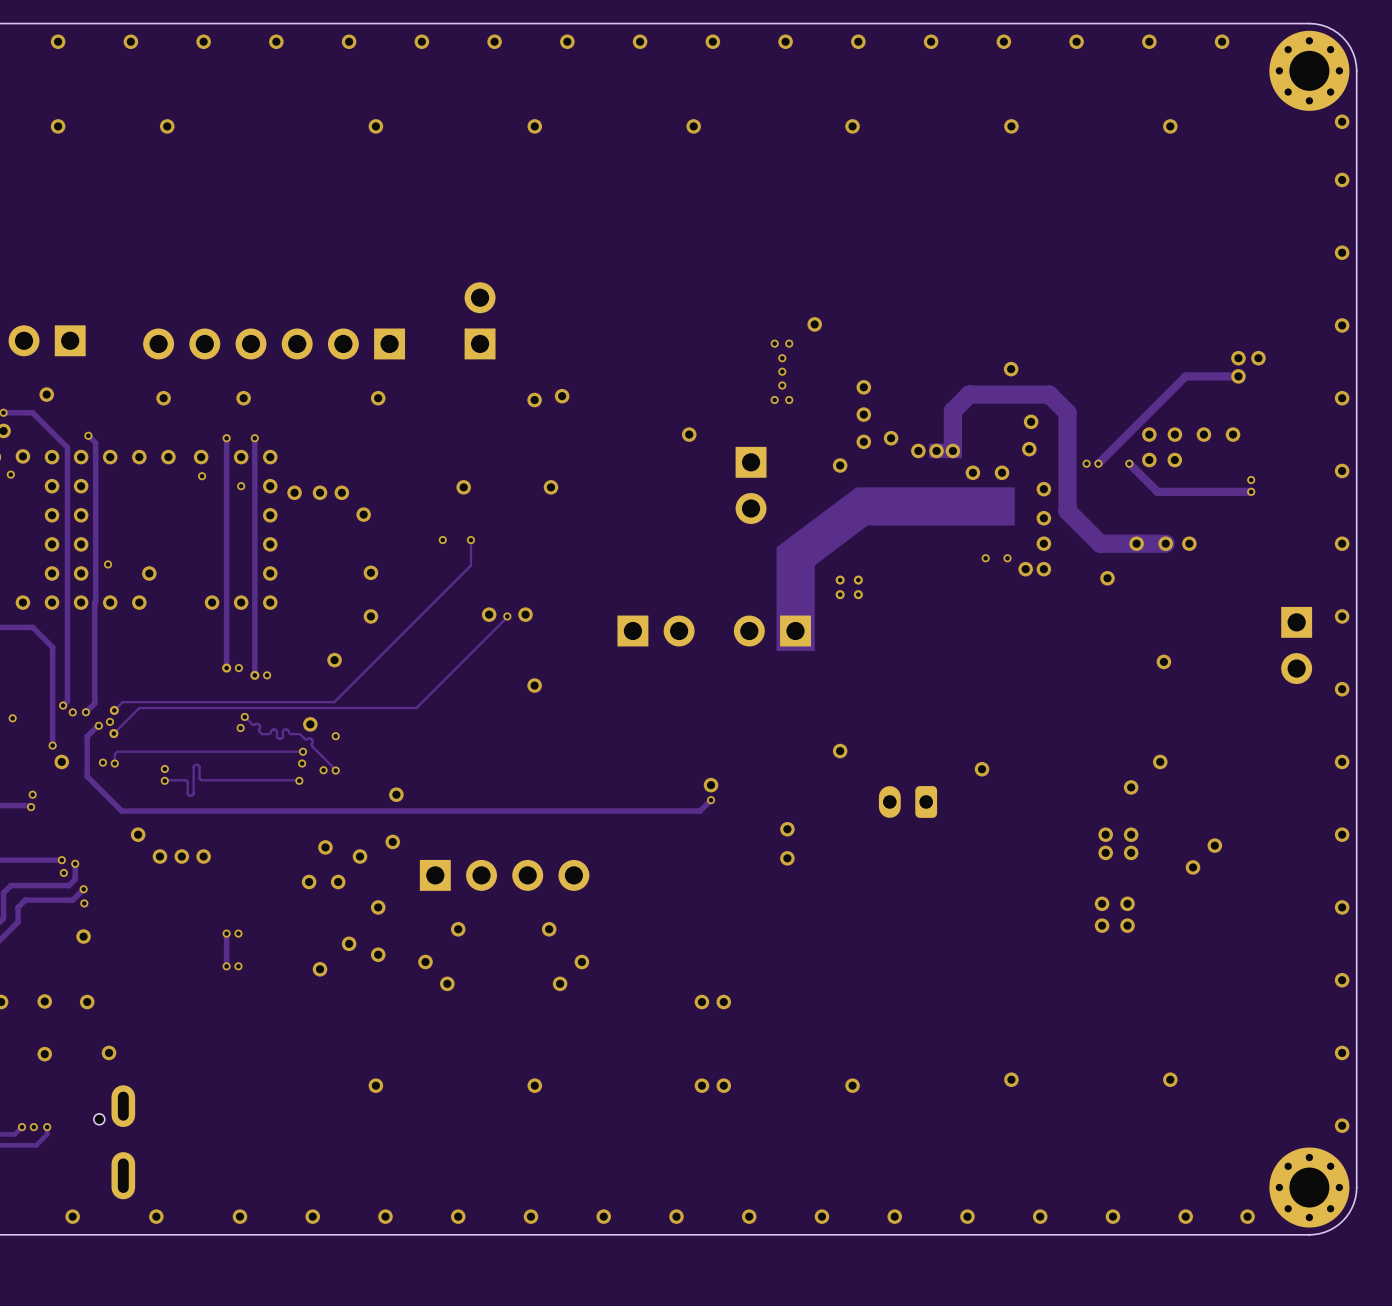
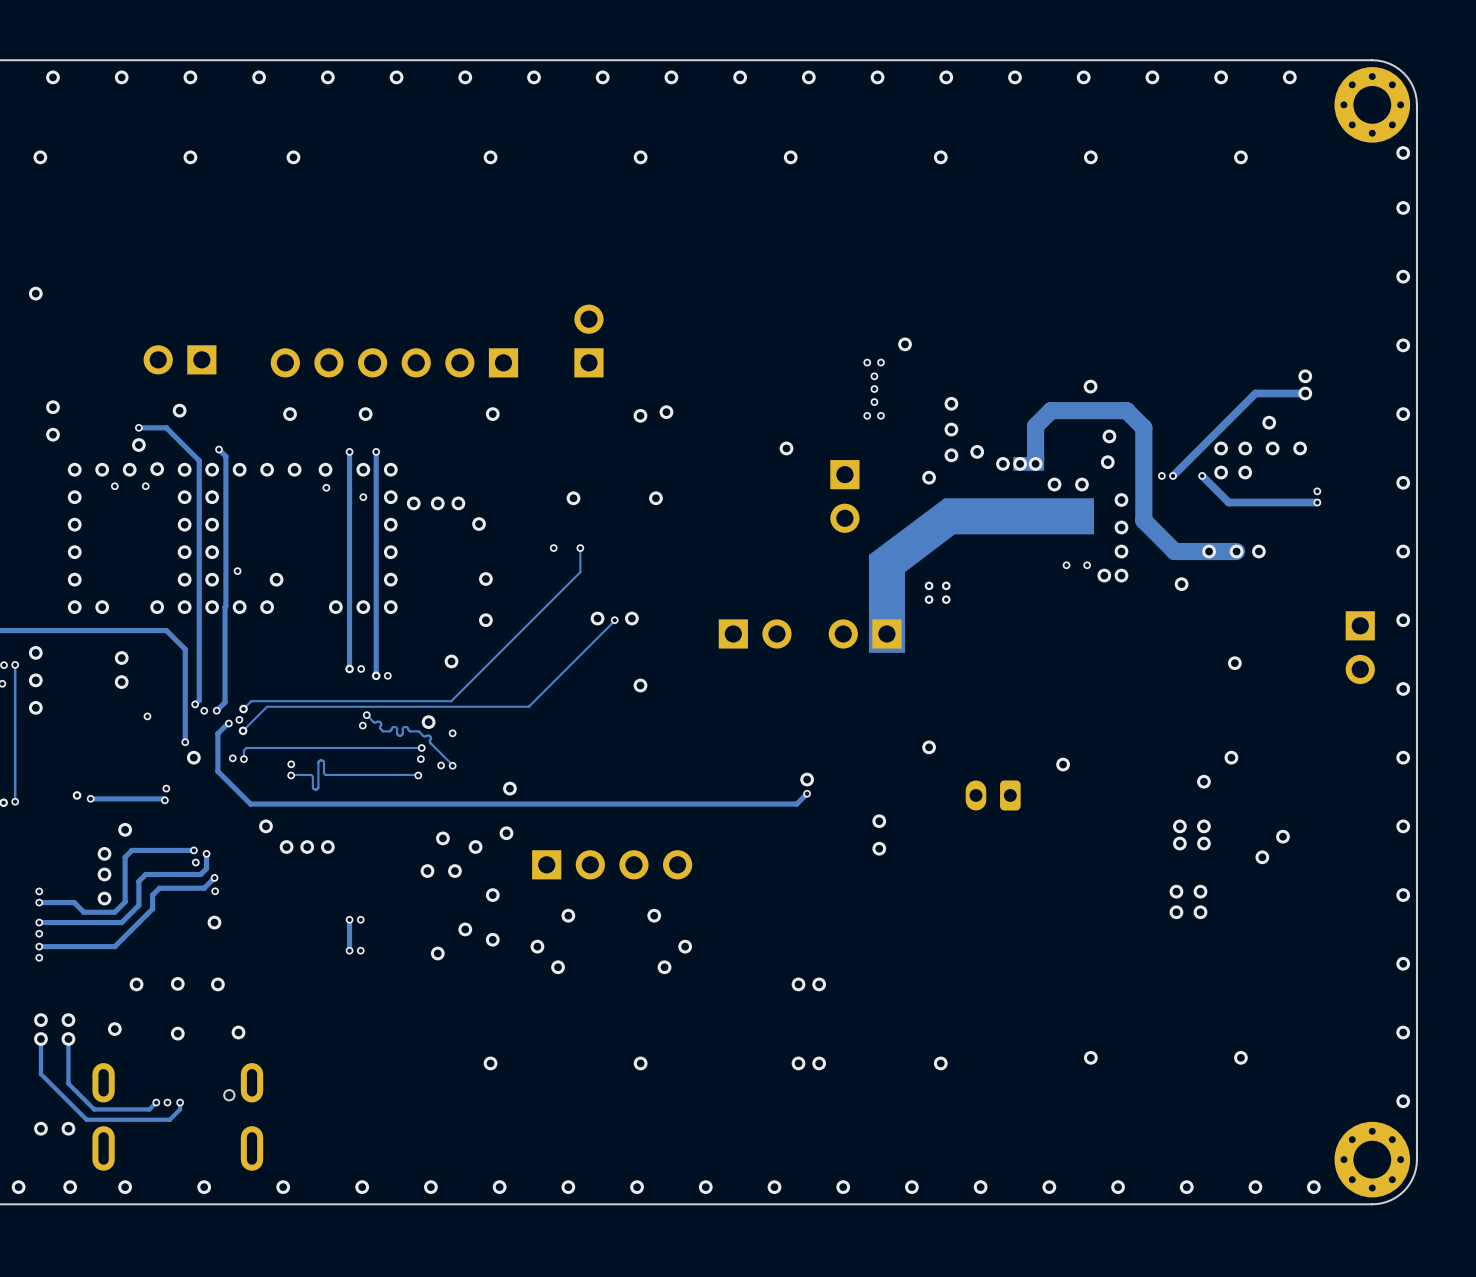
via position: (1258, 358) -> (1269, 422)

